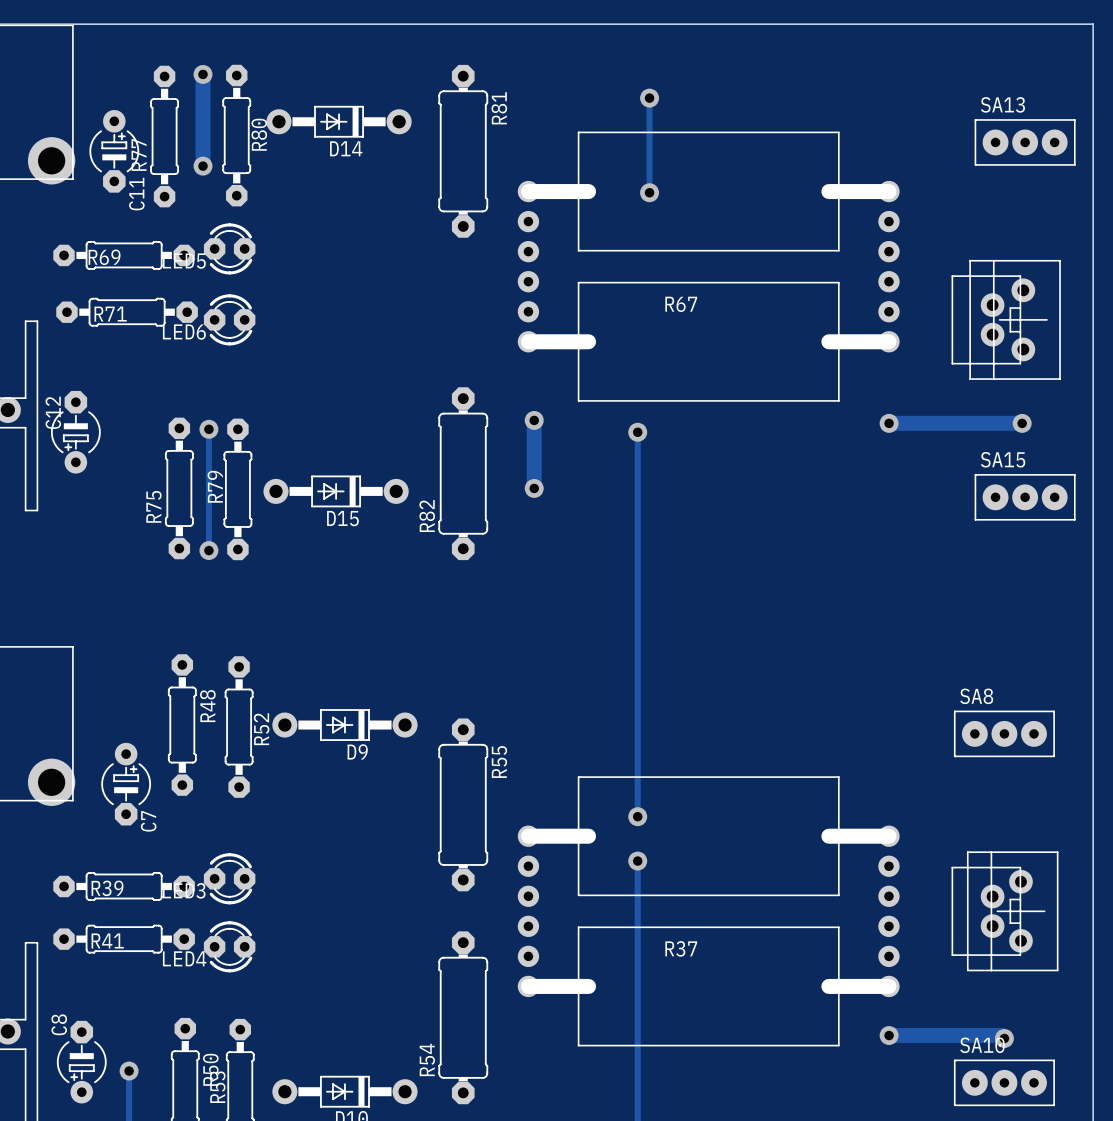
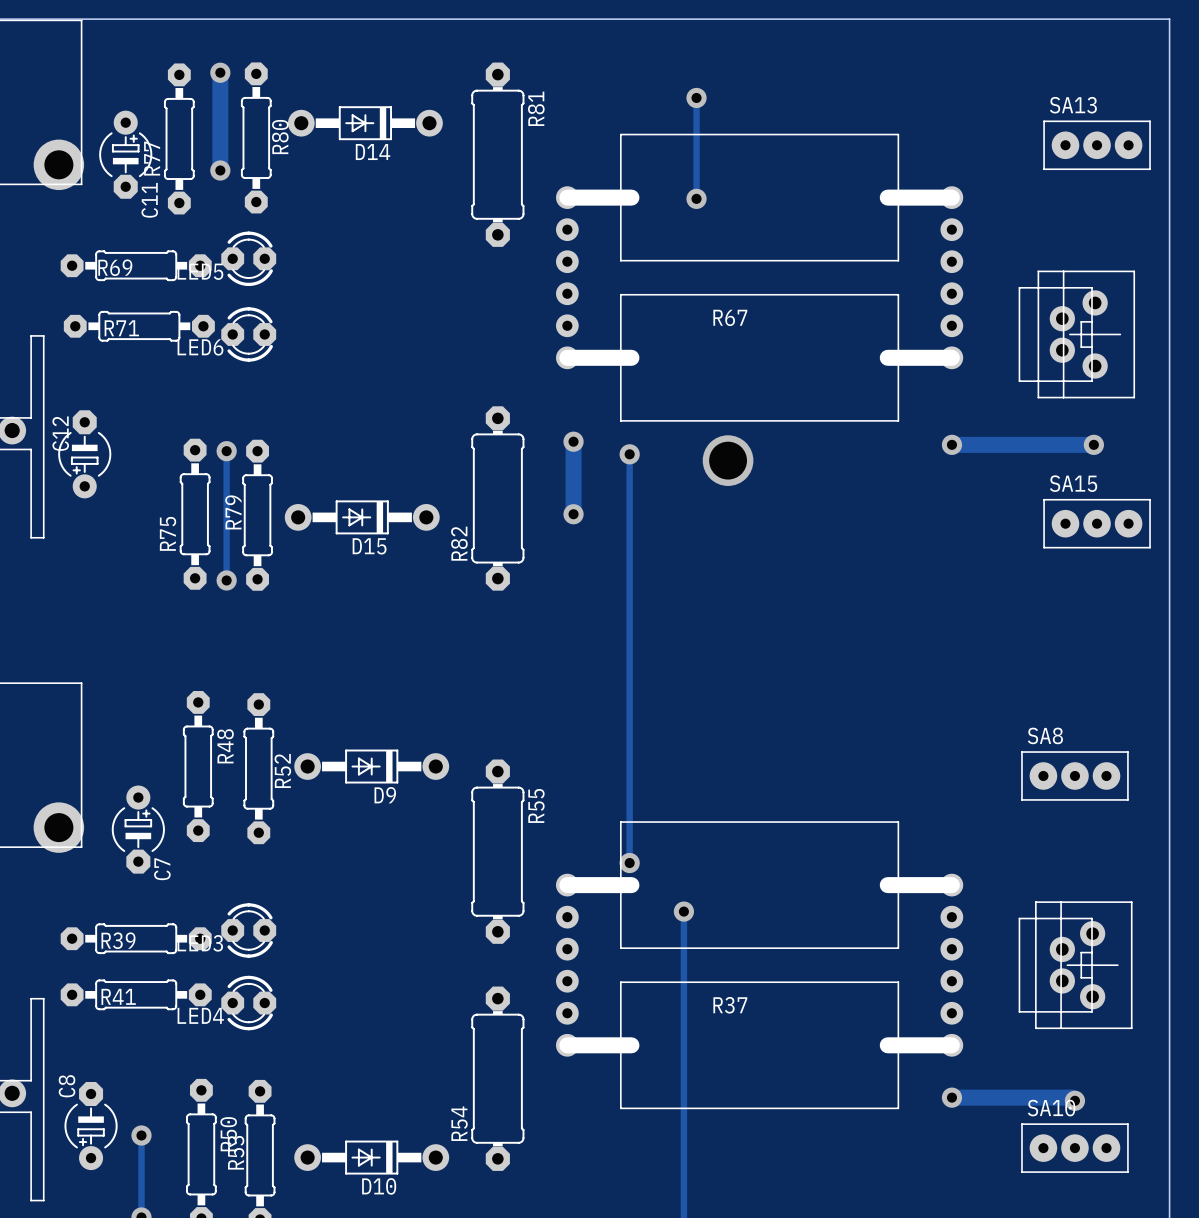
track: none -> (629, 454) (629, 863)
track: (637, 432) (637, 816) -> none
via position: (637, 432) -> (629, 454)
via: none -> (728, 460)
via position: (637, 816) -> (629, 863)

